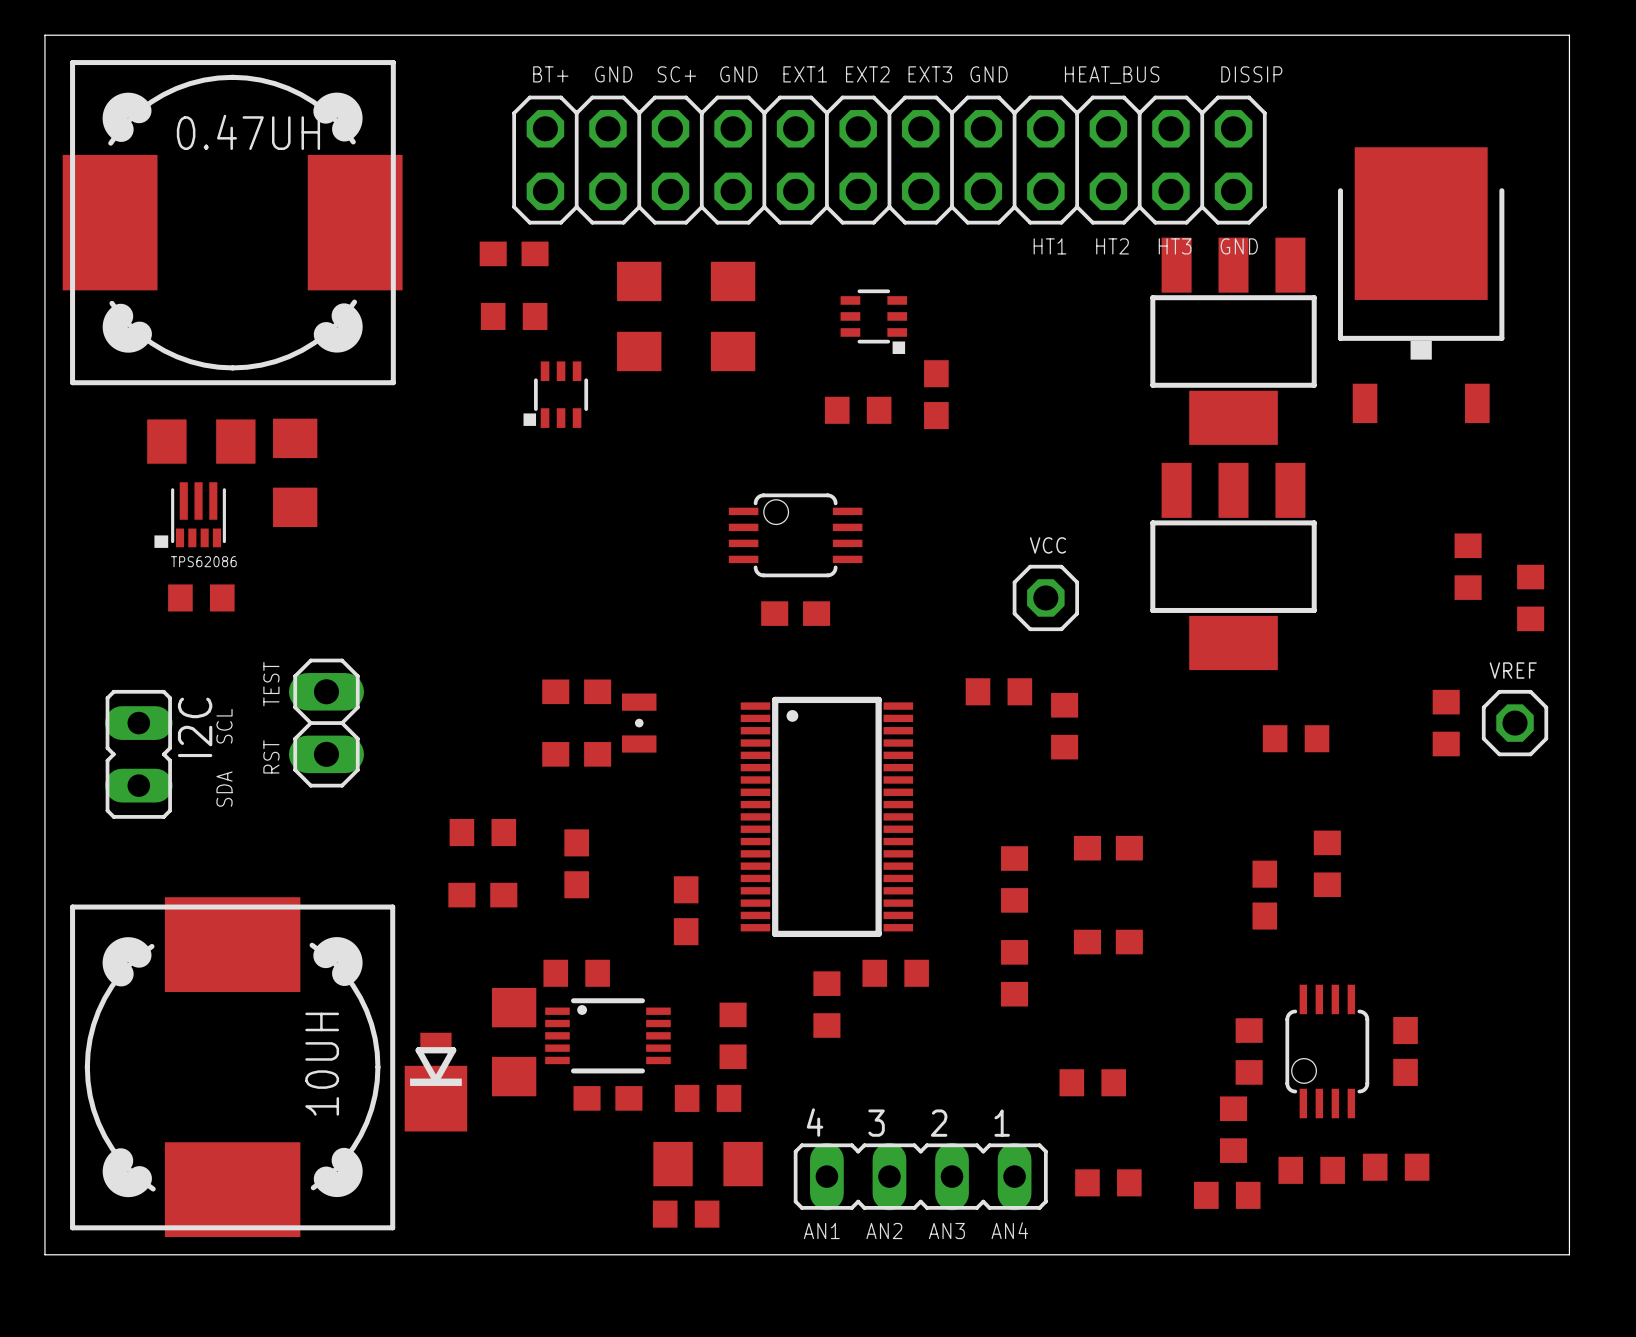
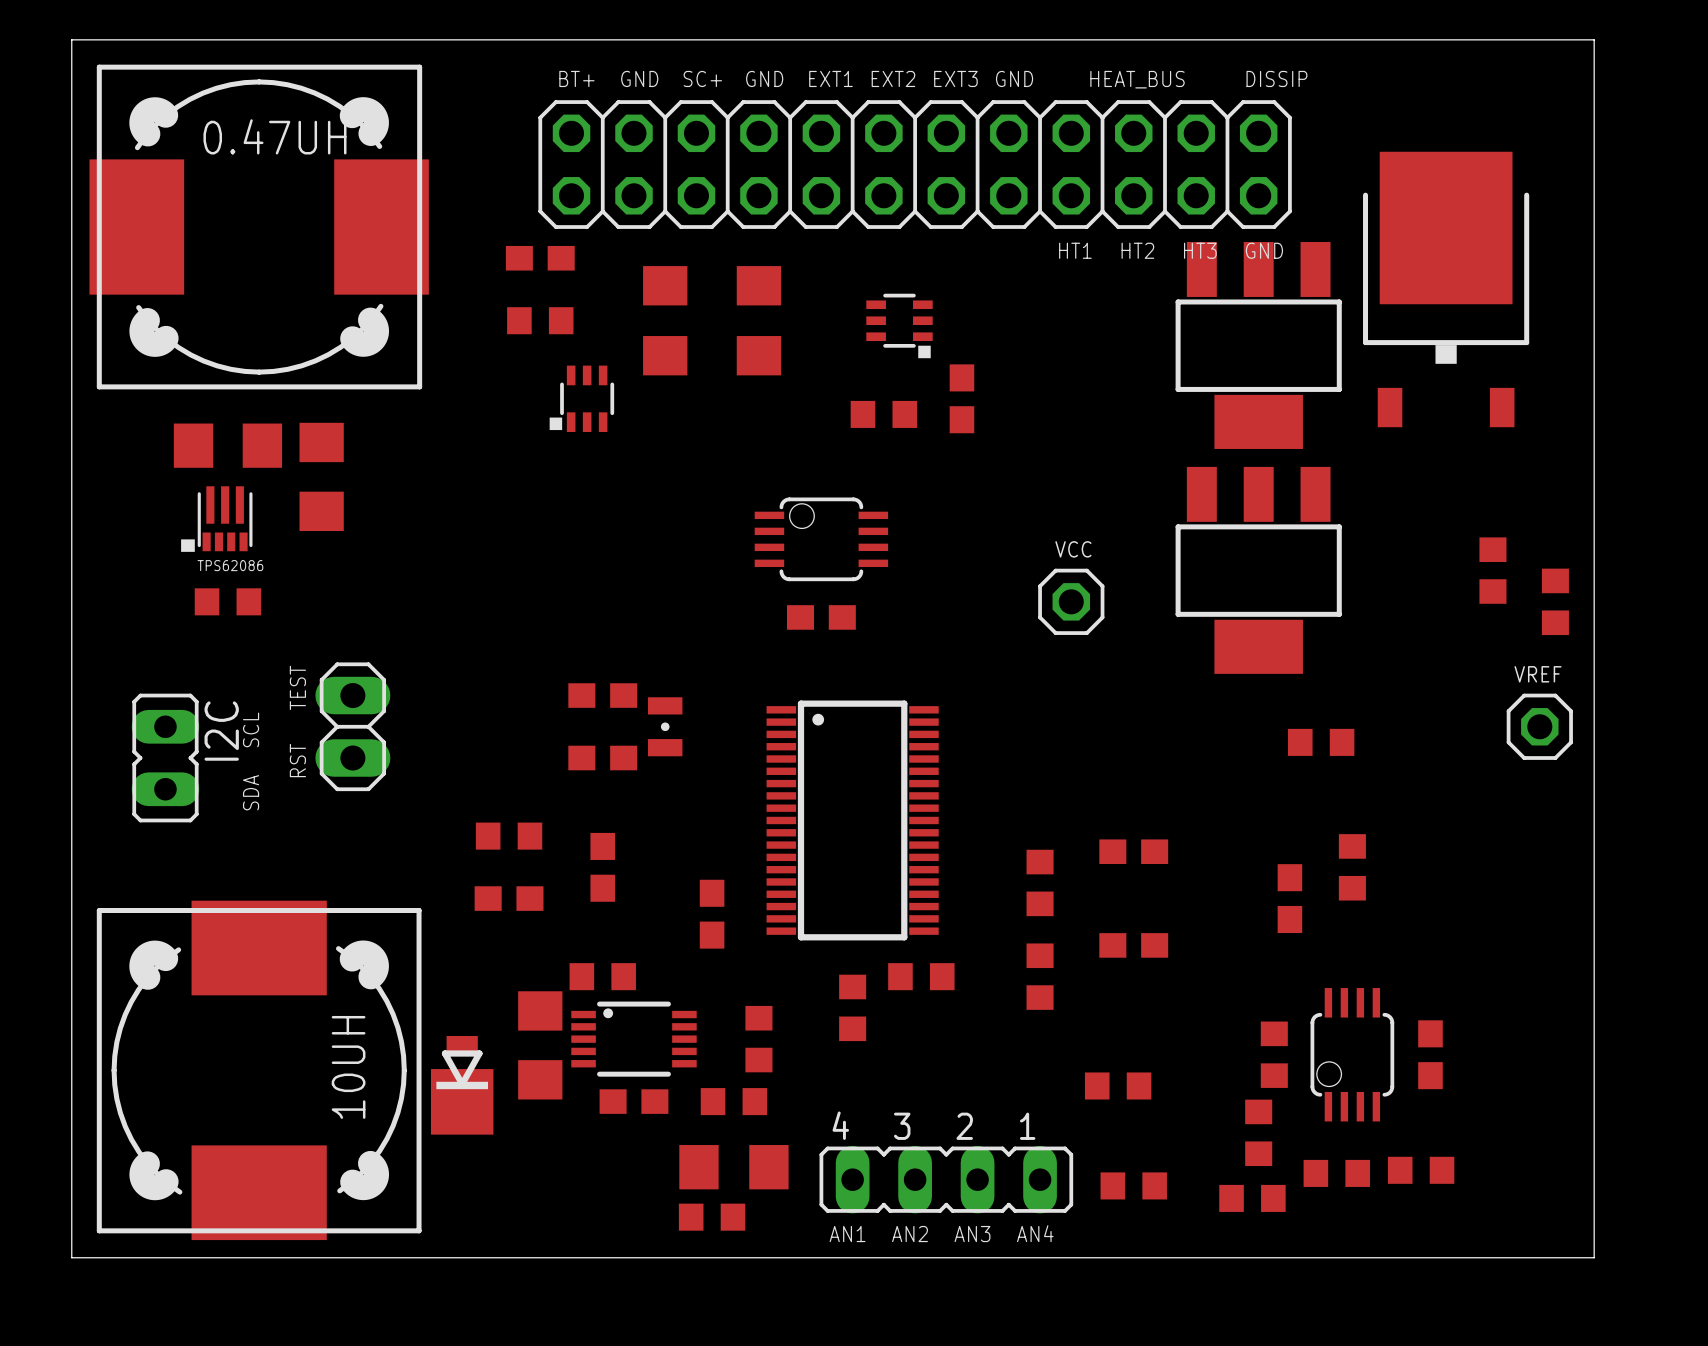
part: (998, 691) -> none
part: (1446, 723) -> none
part: (1064, 726) -> none

